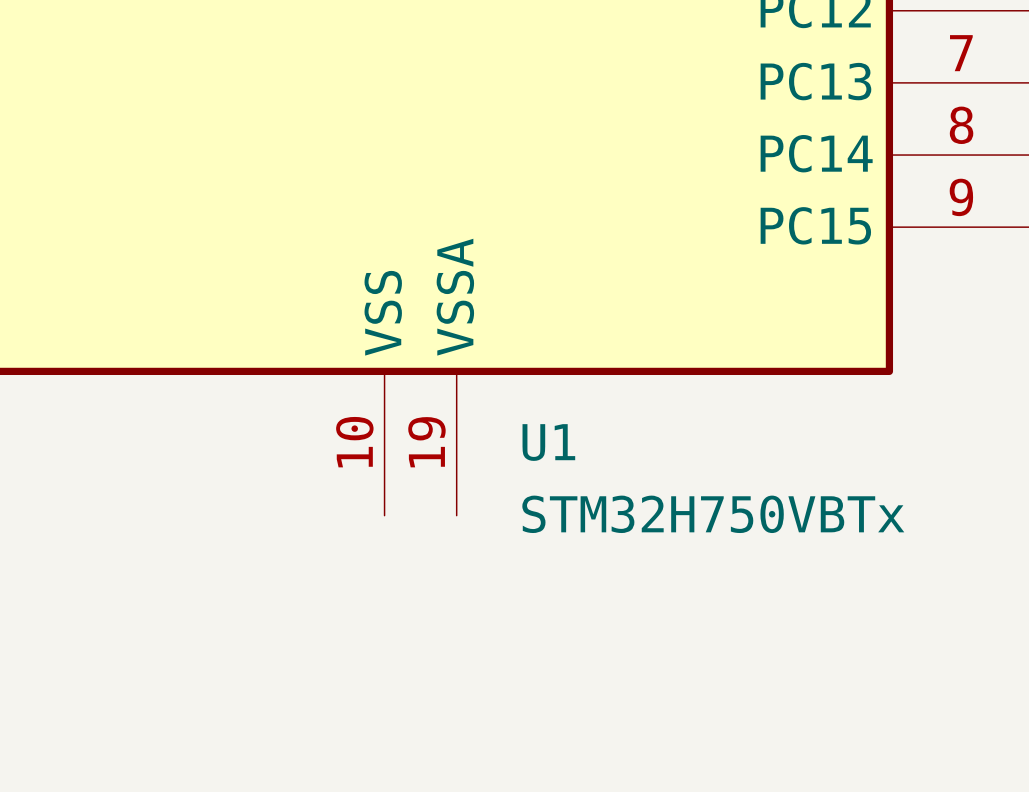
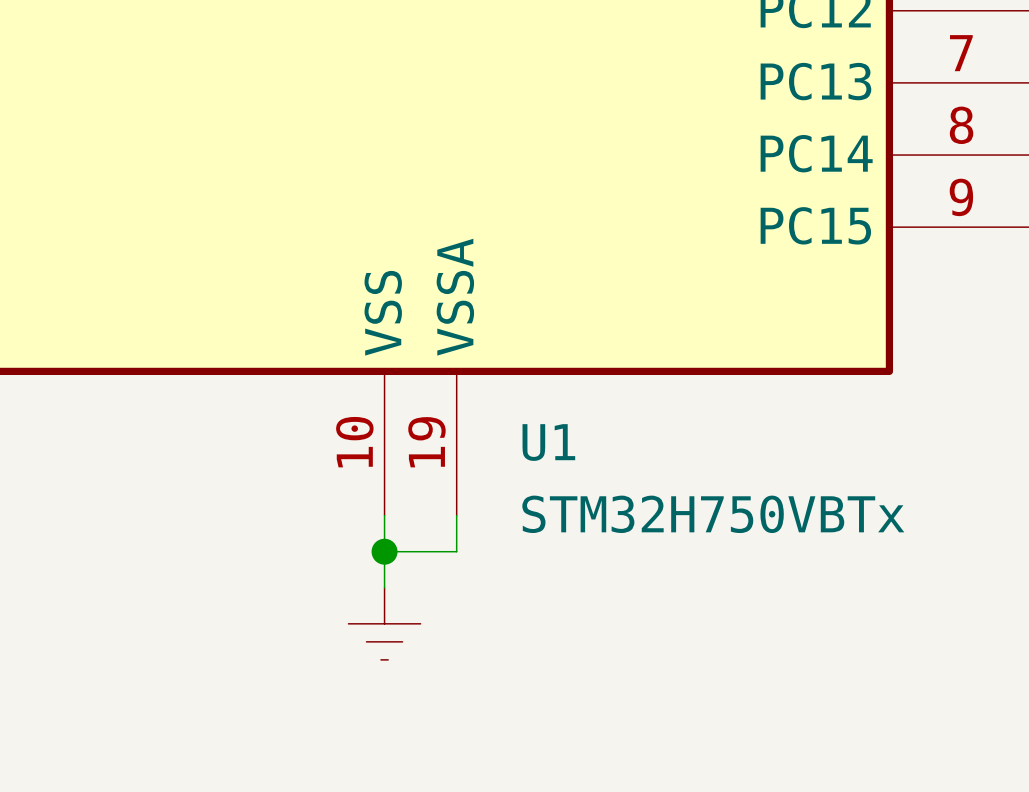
wire: none -> (384, 515) (384, 587)
wire: none -> (456, 515) (456, 551) (384, 551)
junction: none -> (384, 551)
power symbol: none -> (384, 623)

